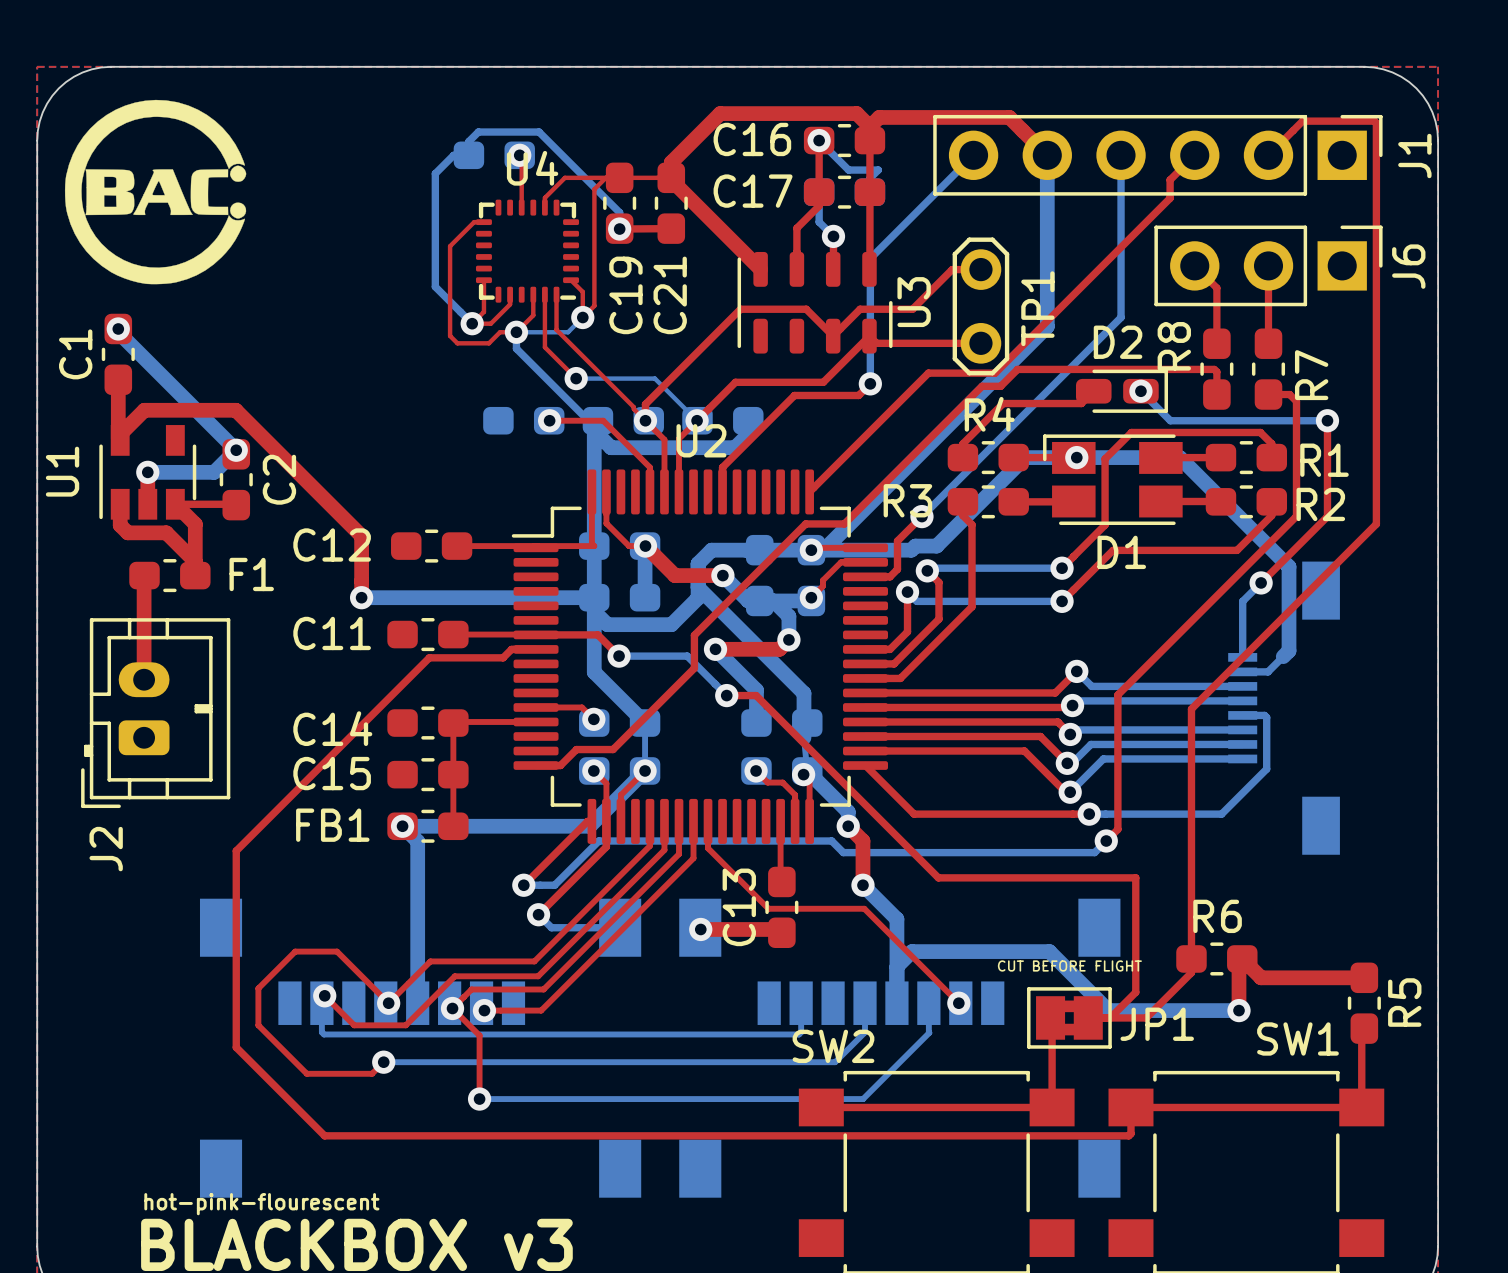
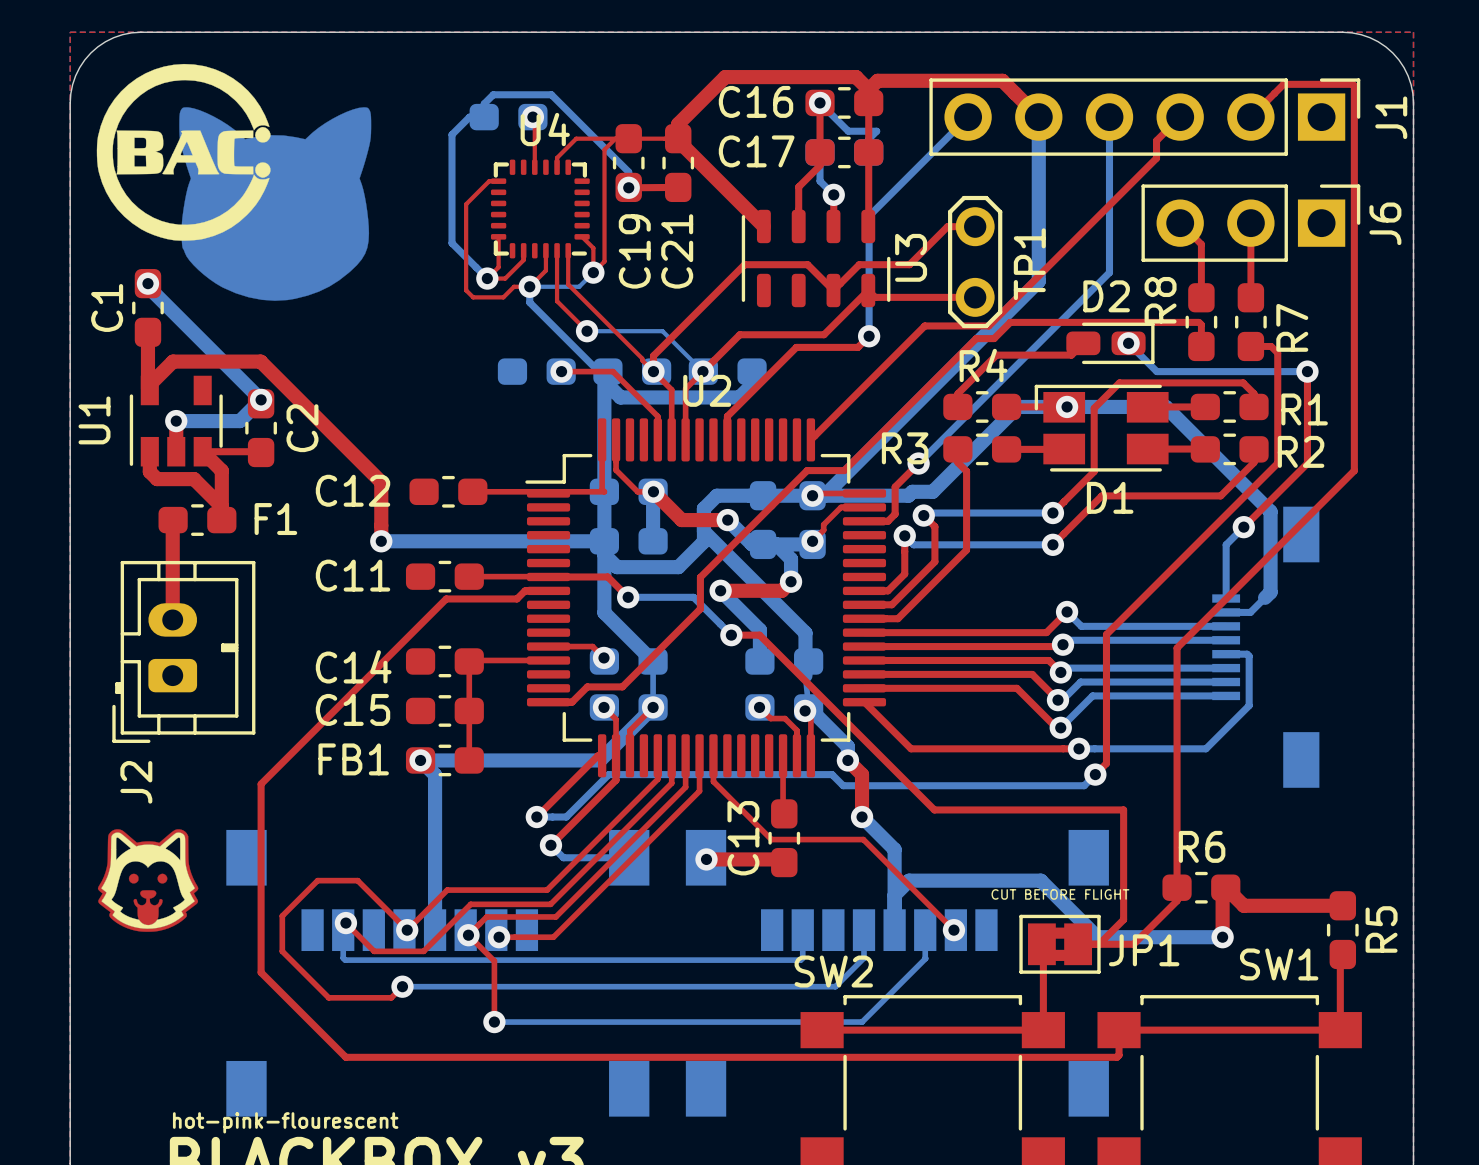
drawing: none -> [179, 107, 372, 301]
drawing: none -> [97, 829, 199, 932]

